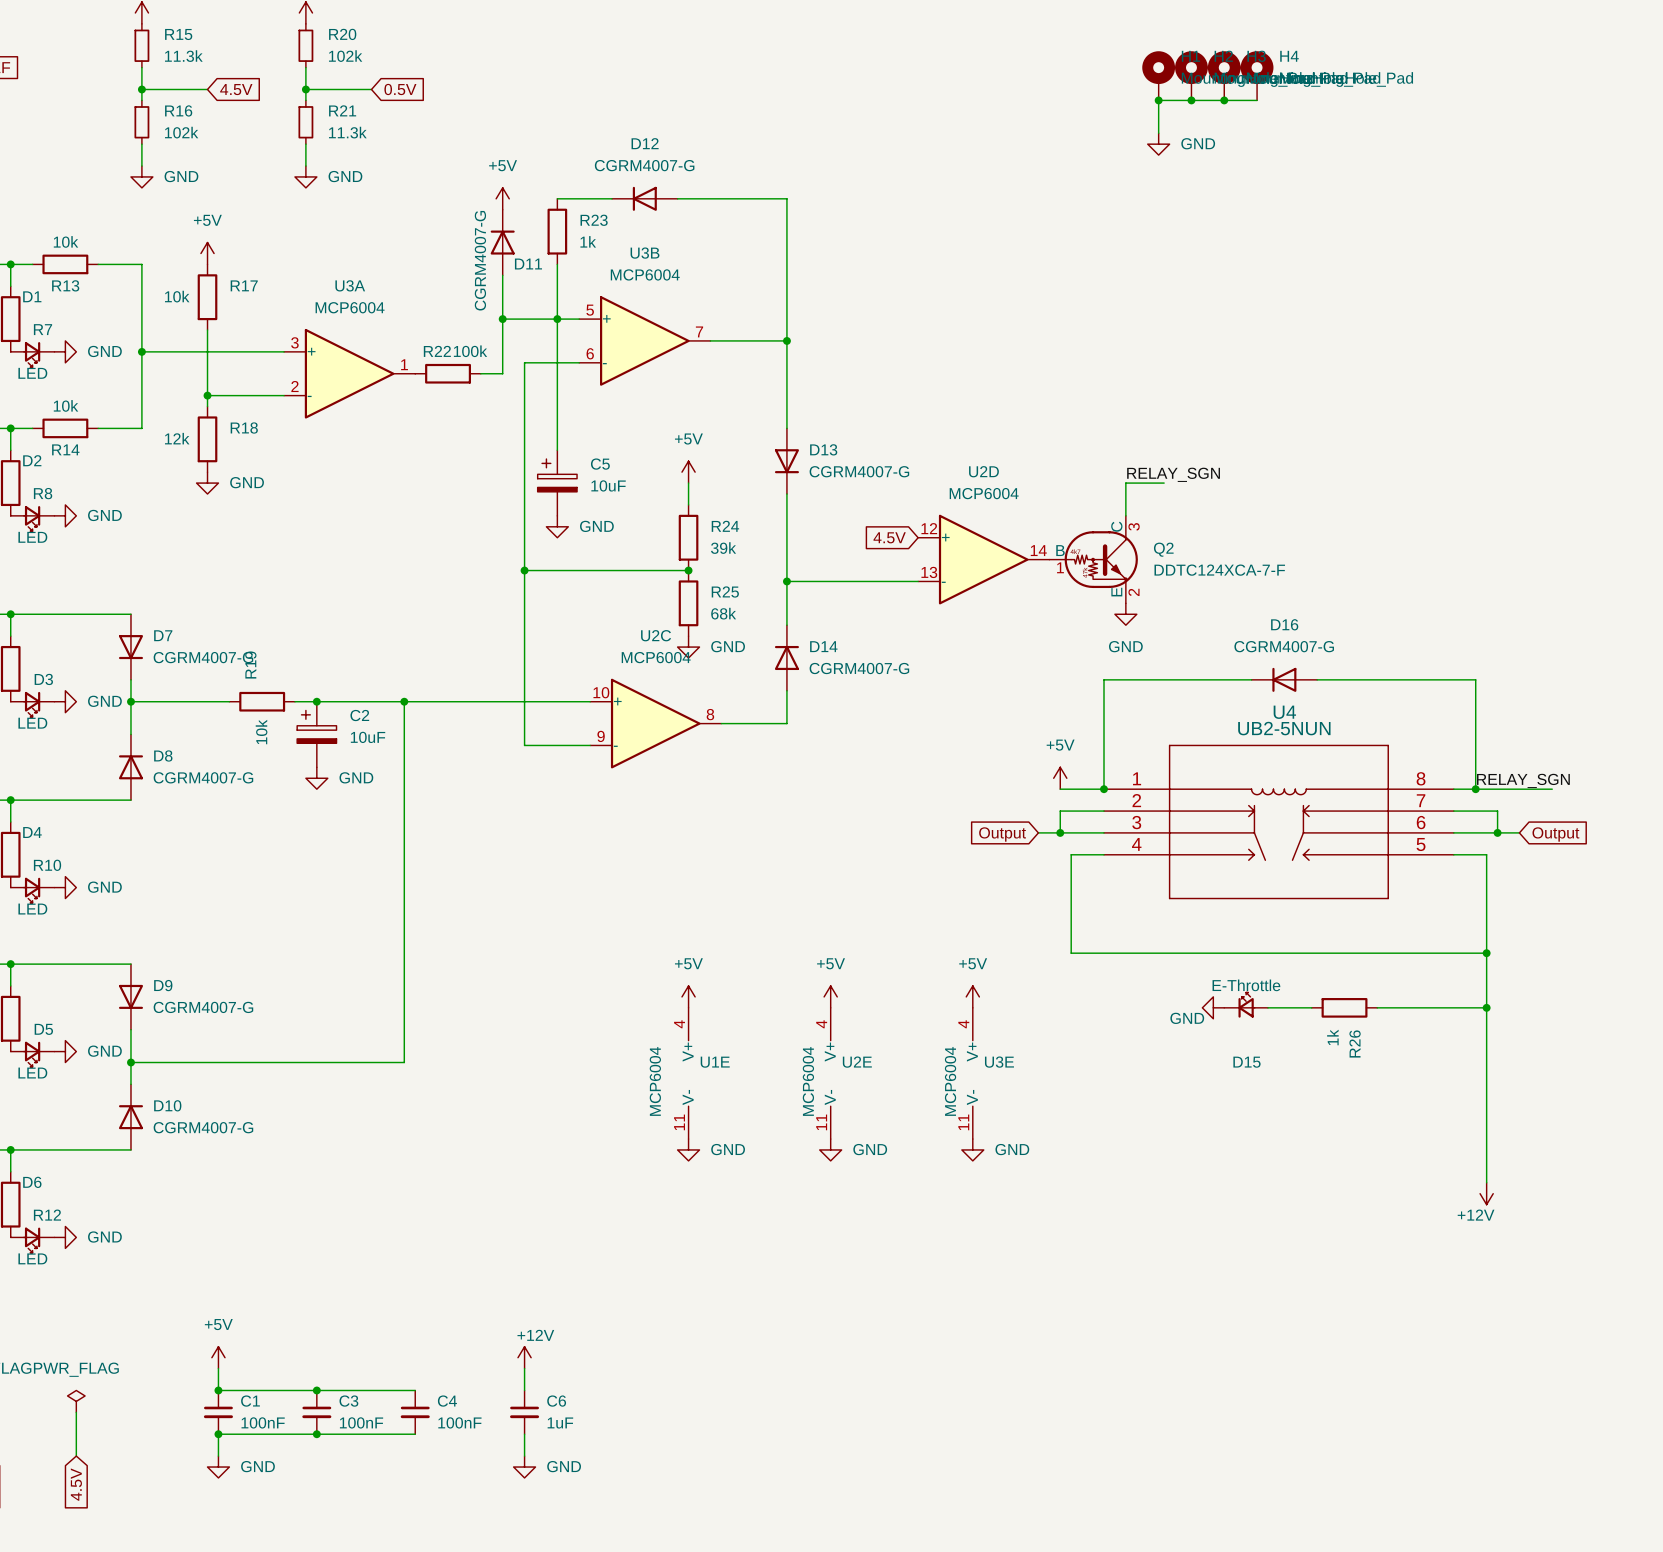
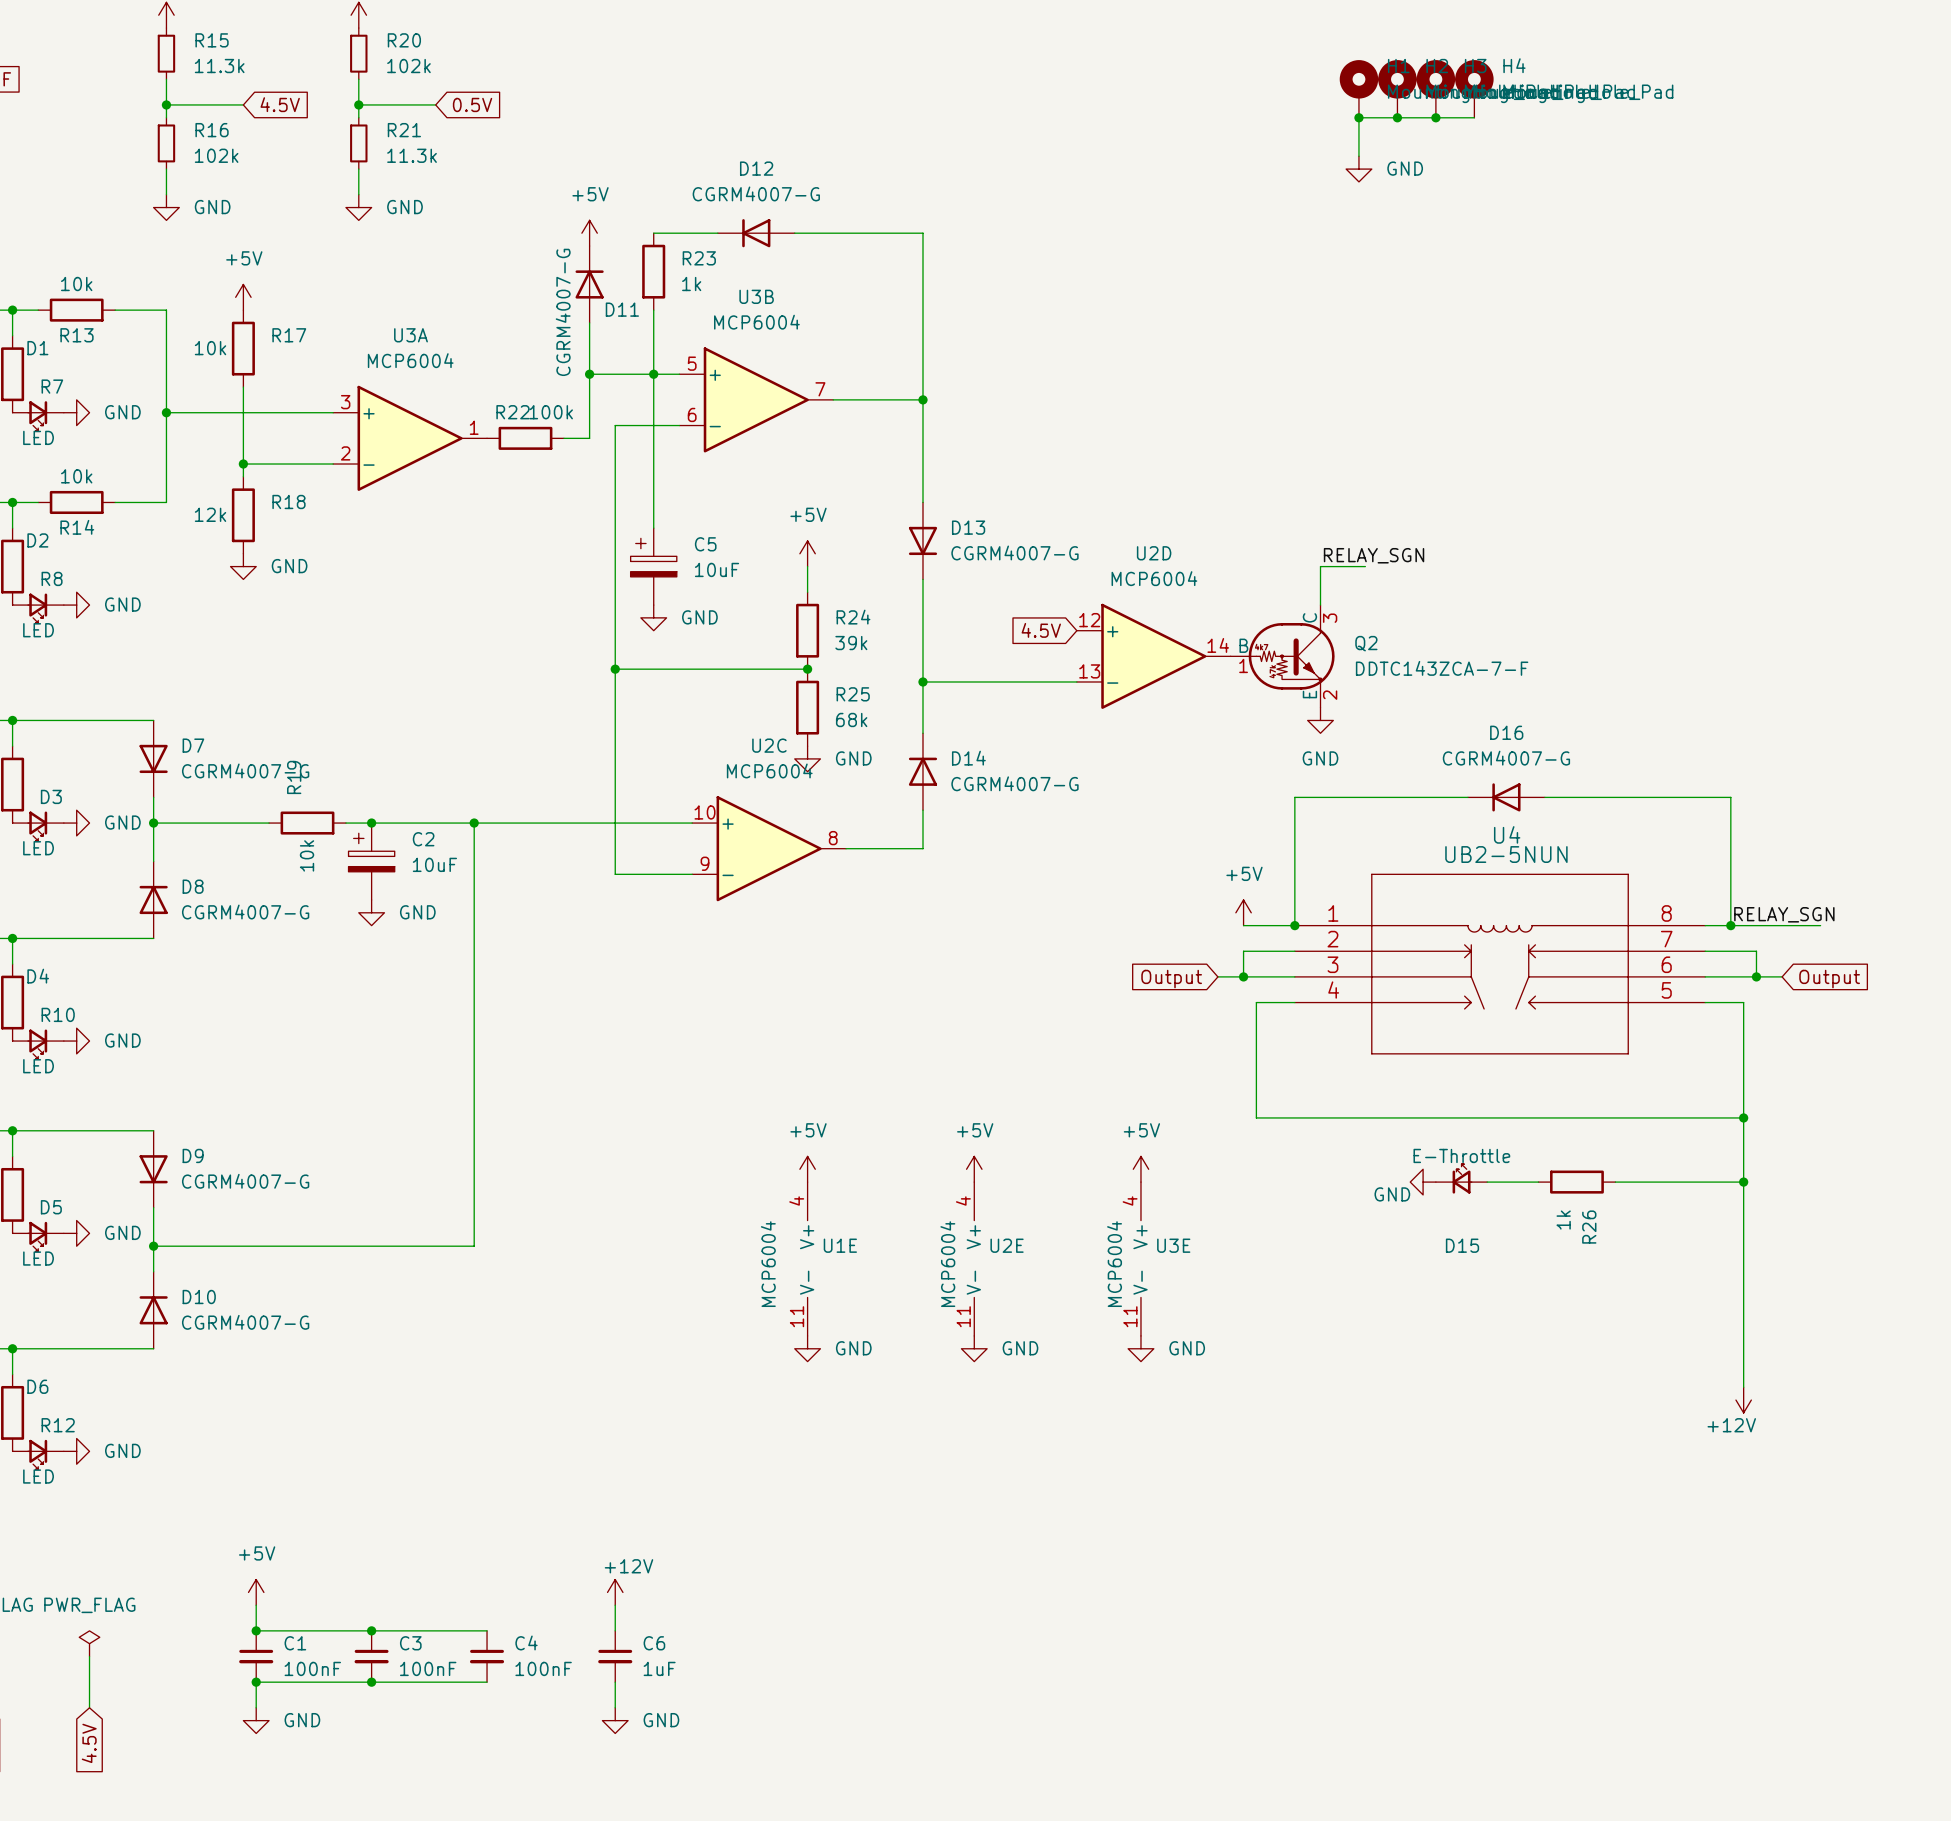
Q2 value: DDTC124XCA-7-F (1219, 570) -> DDTC143ZCA-7-F (1442, 668)

